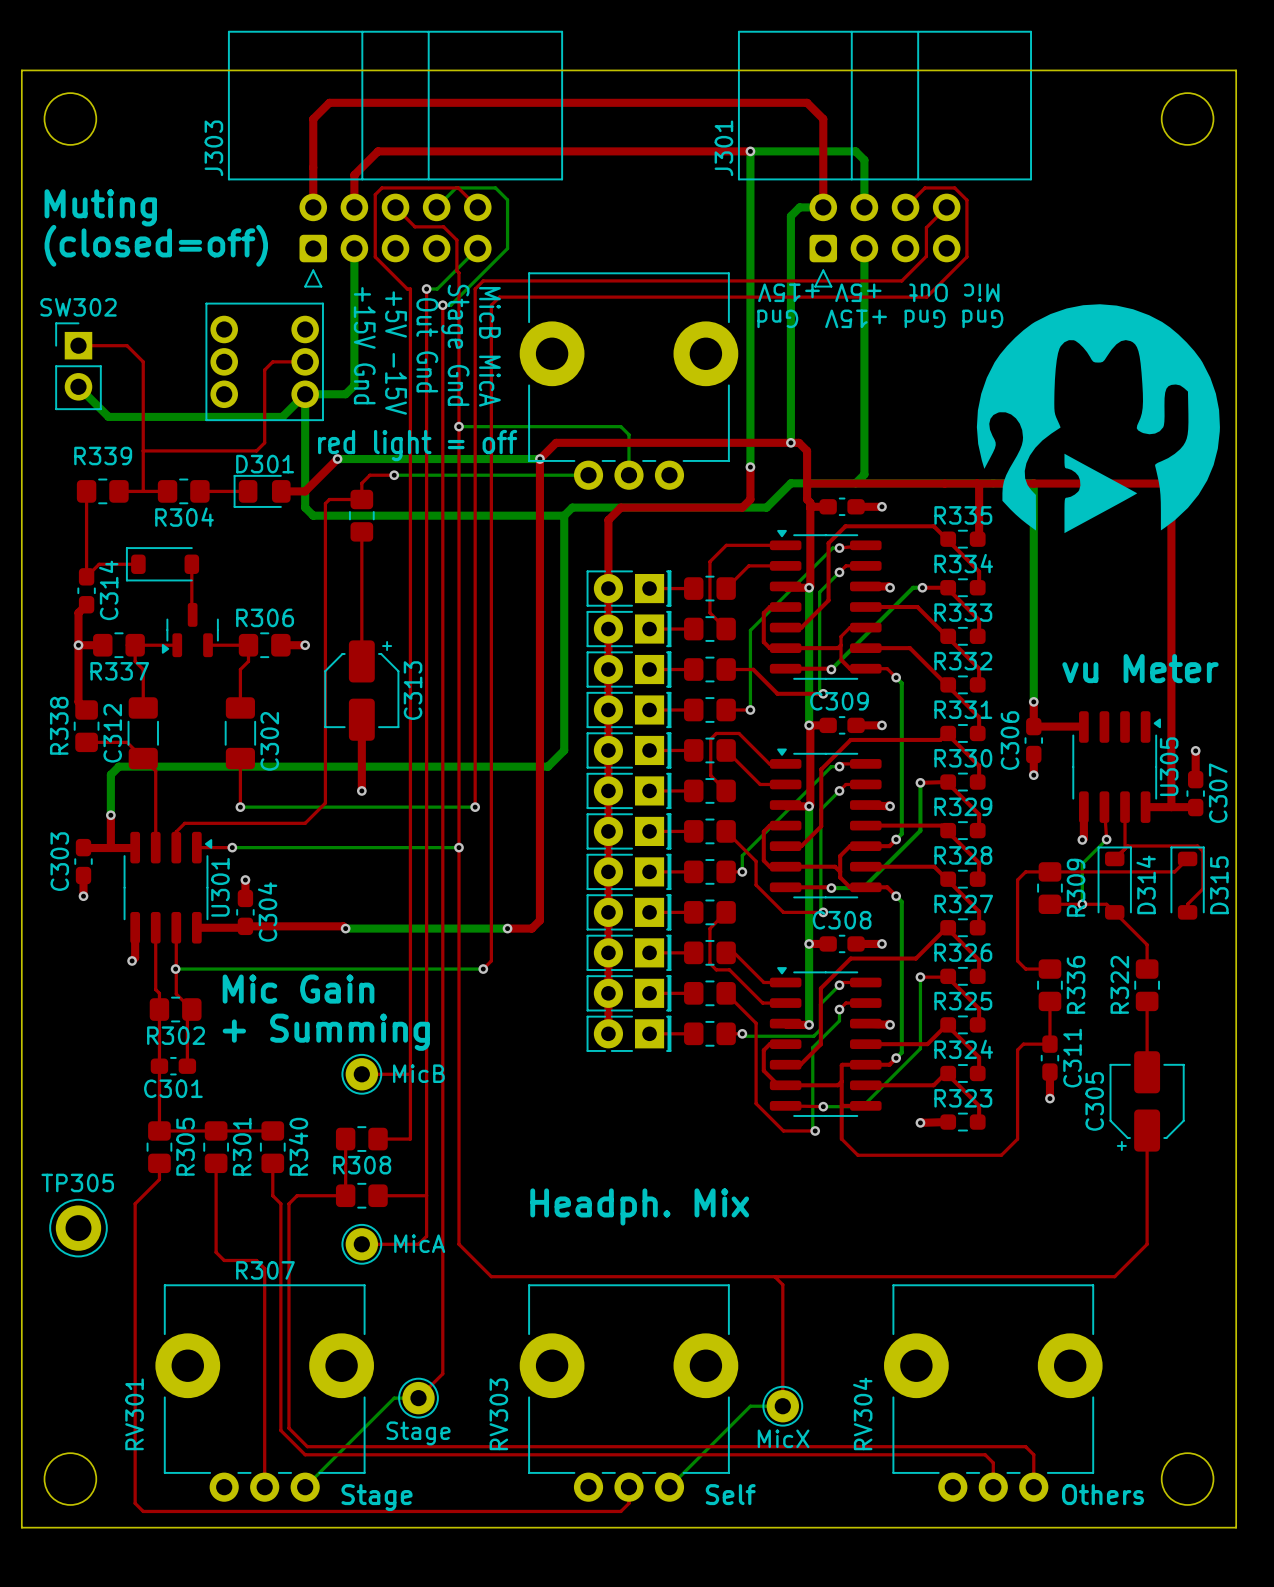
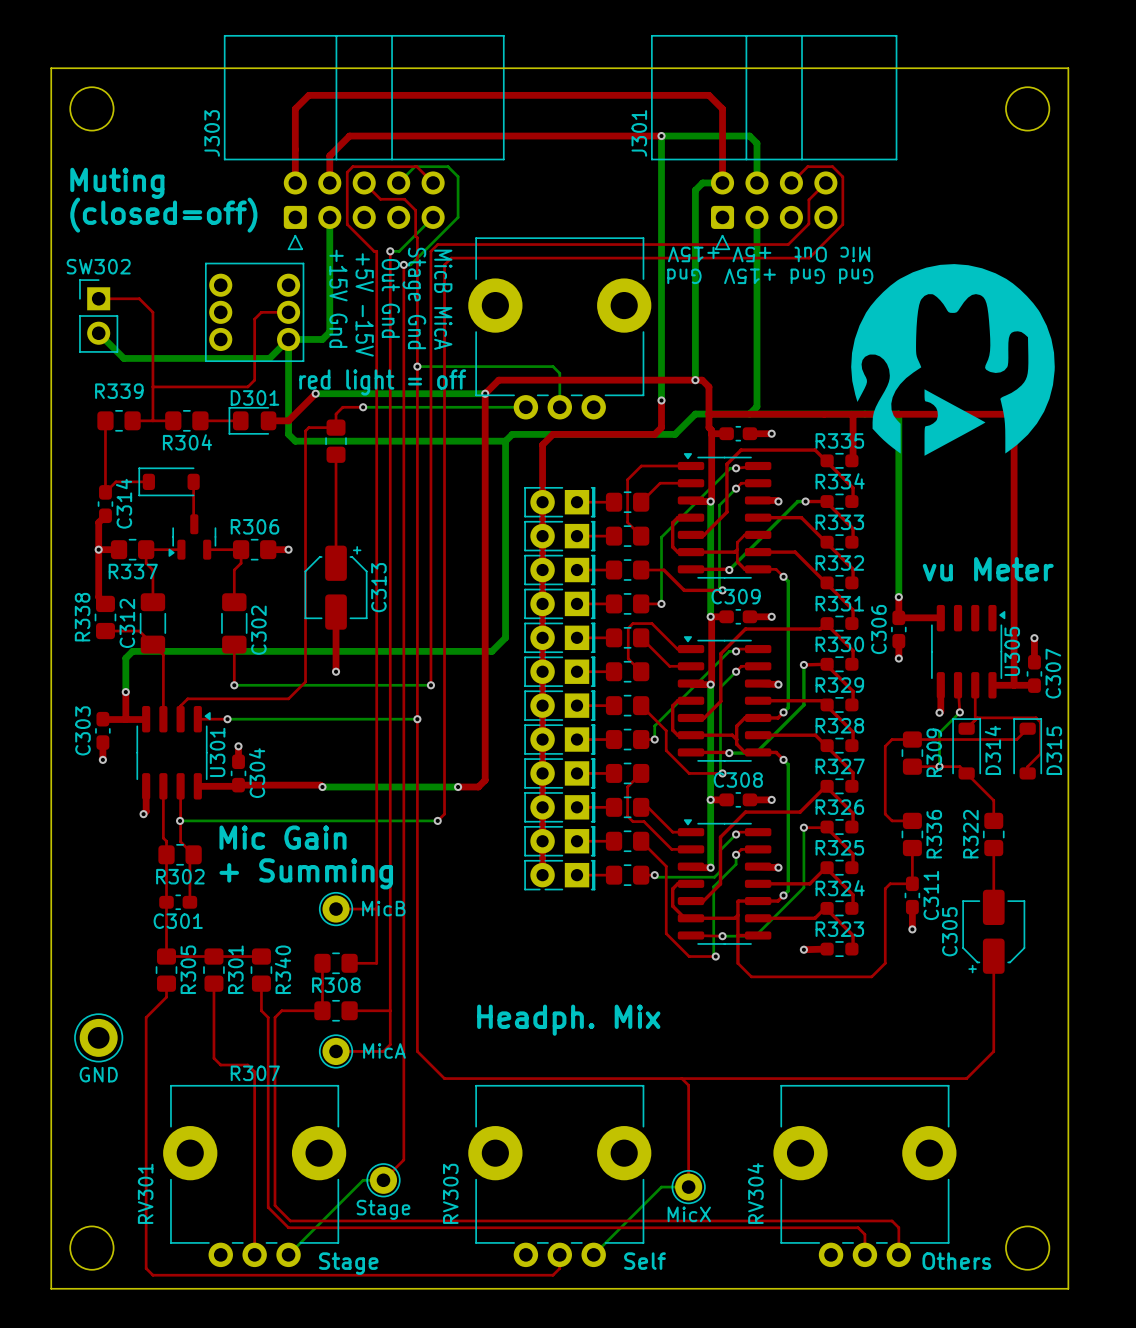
TP305 name: TP305 (77, 1182) -> none
TP305 value: none -> GND (98, 1074)

